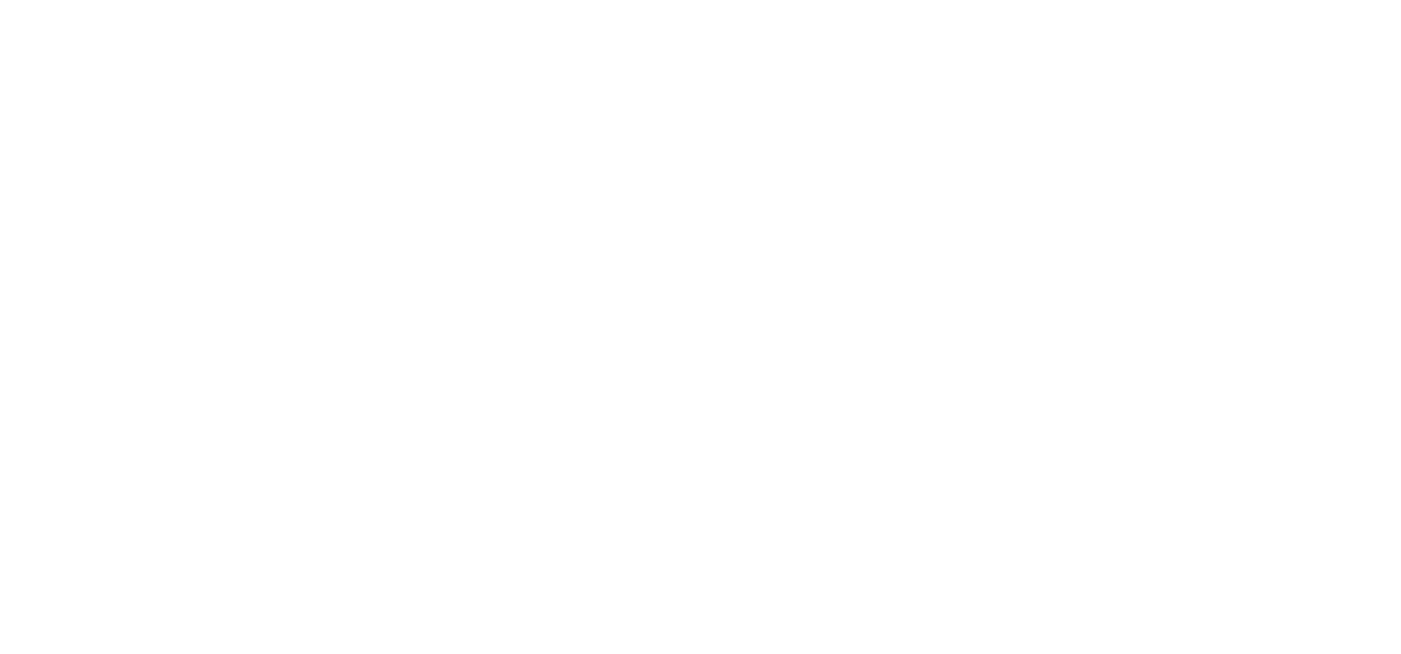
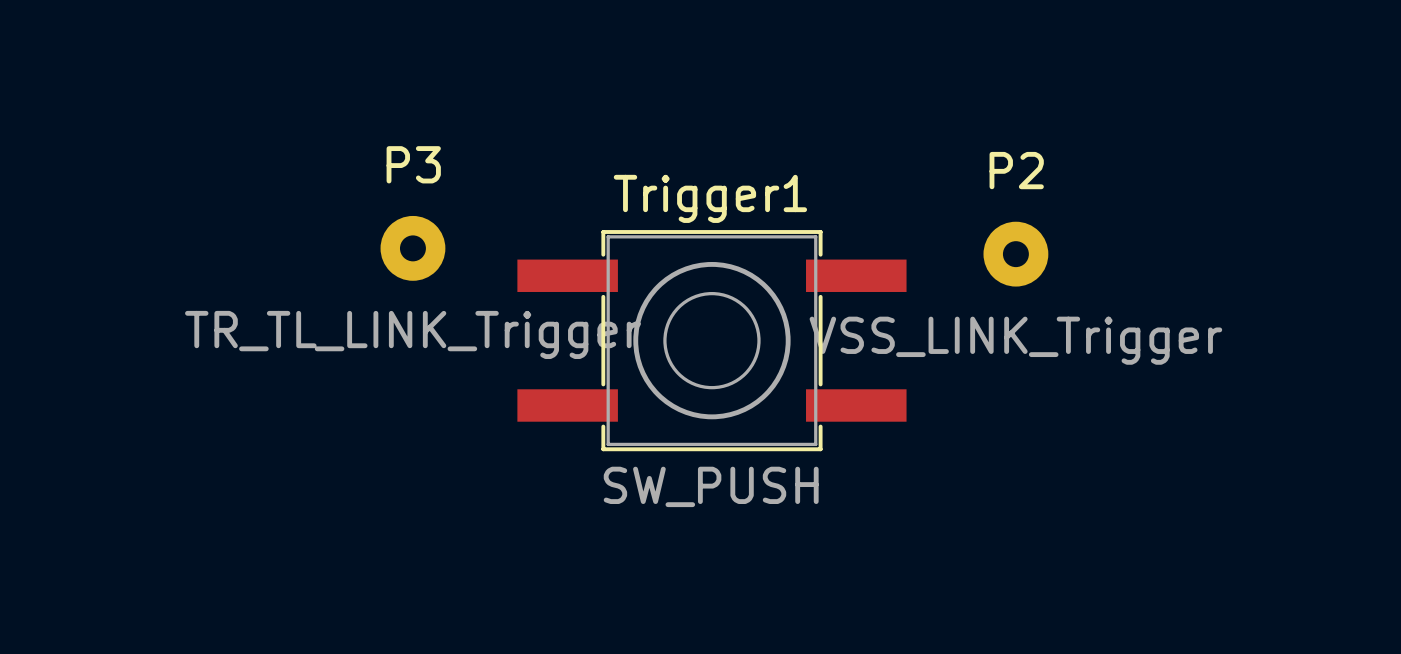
P3: none -> TR_TL_LINK_Trigger (412, 248)
P2: none -> VSS_LINK_Trigger (1015, 254)
Trigger1: none -> SW_PUSH (711, 340)

